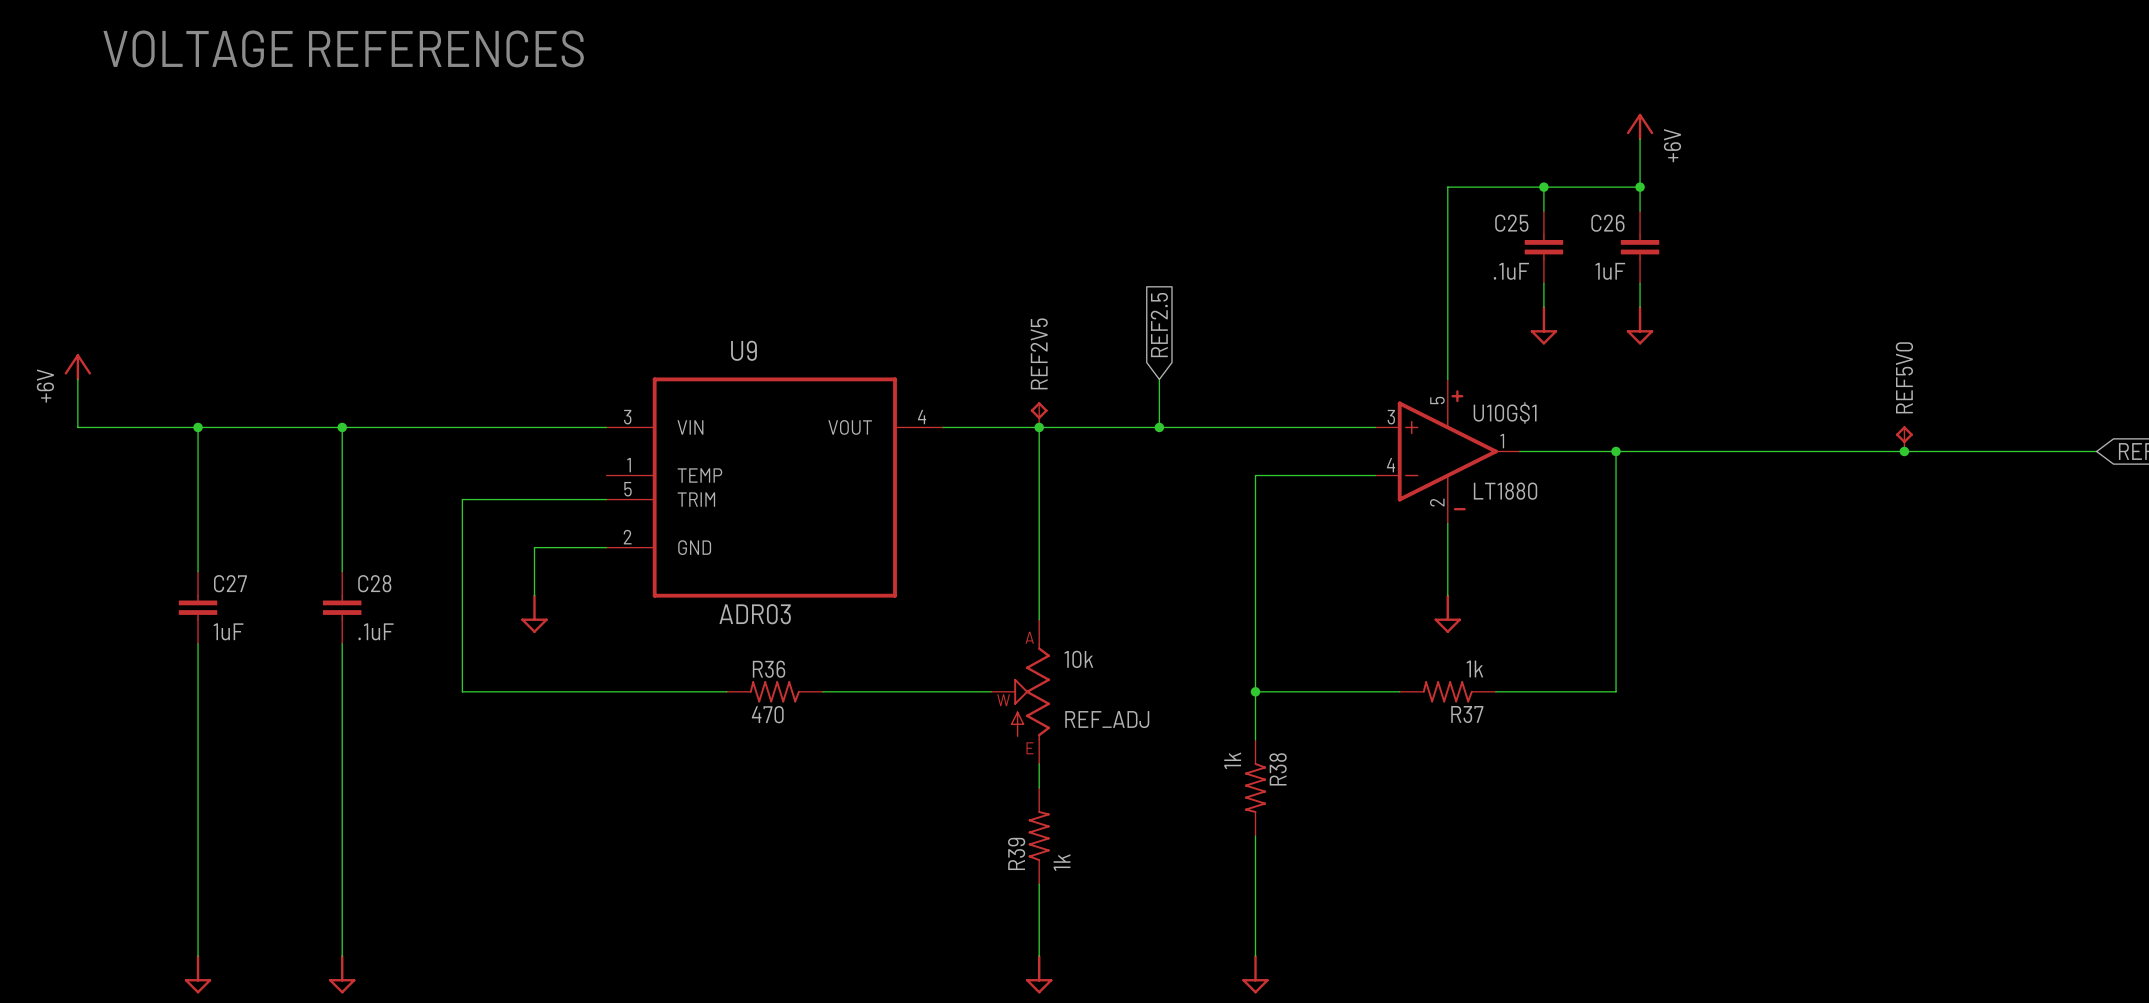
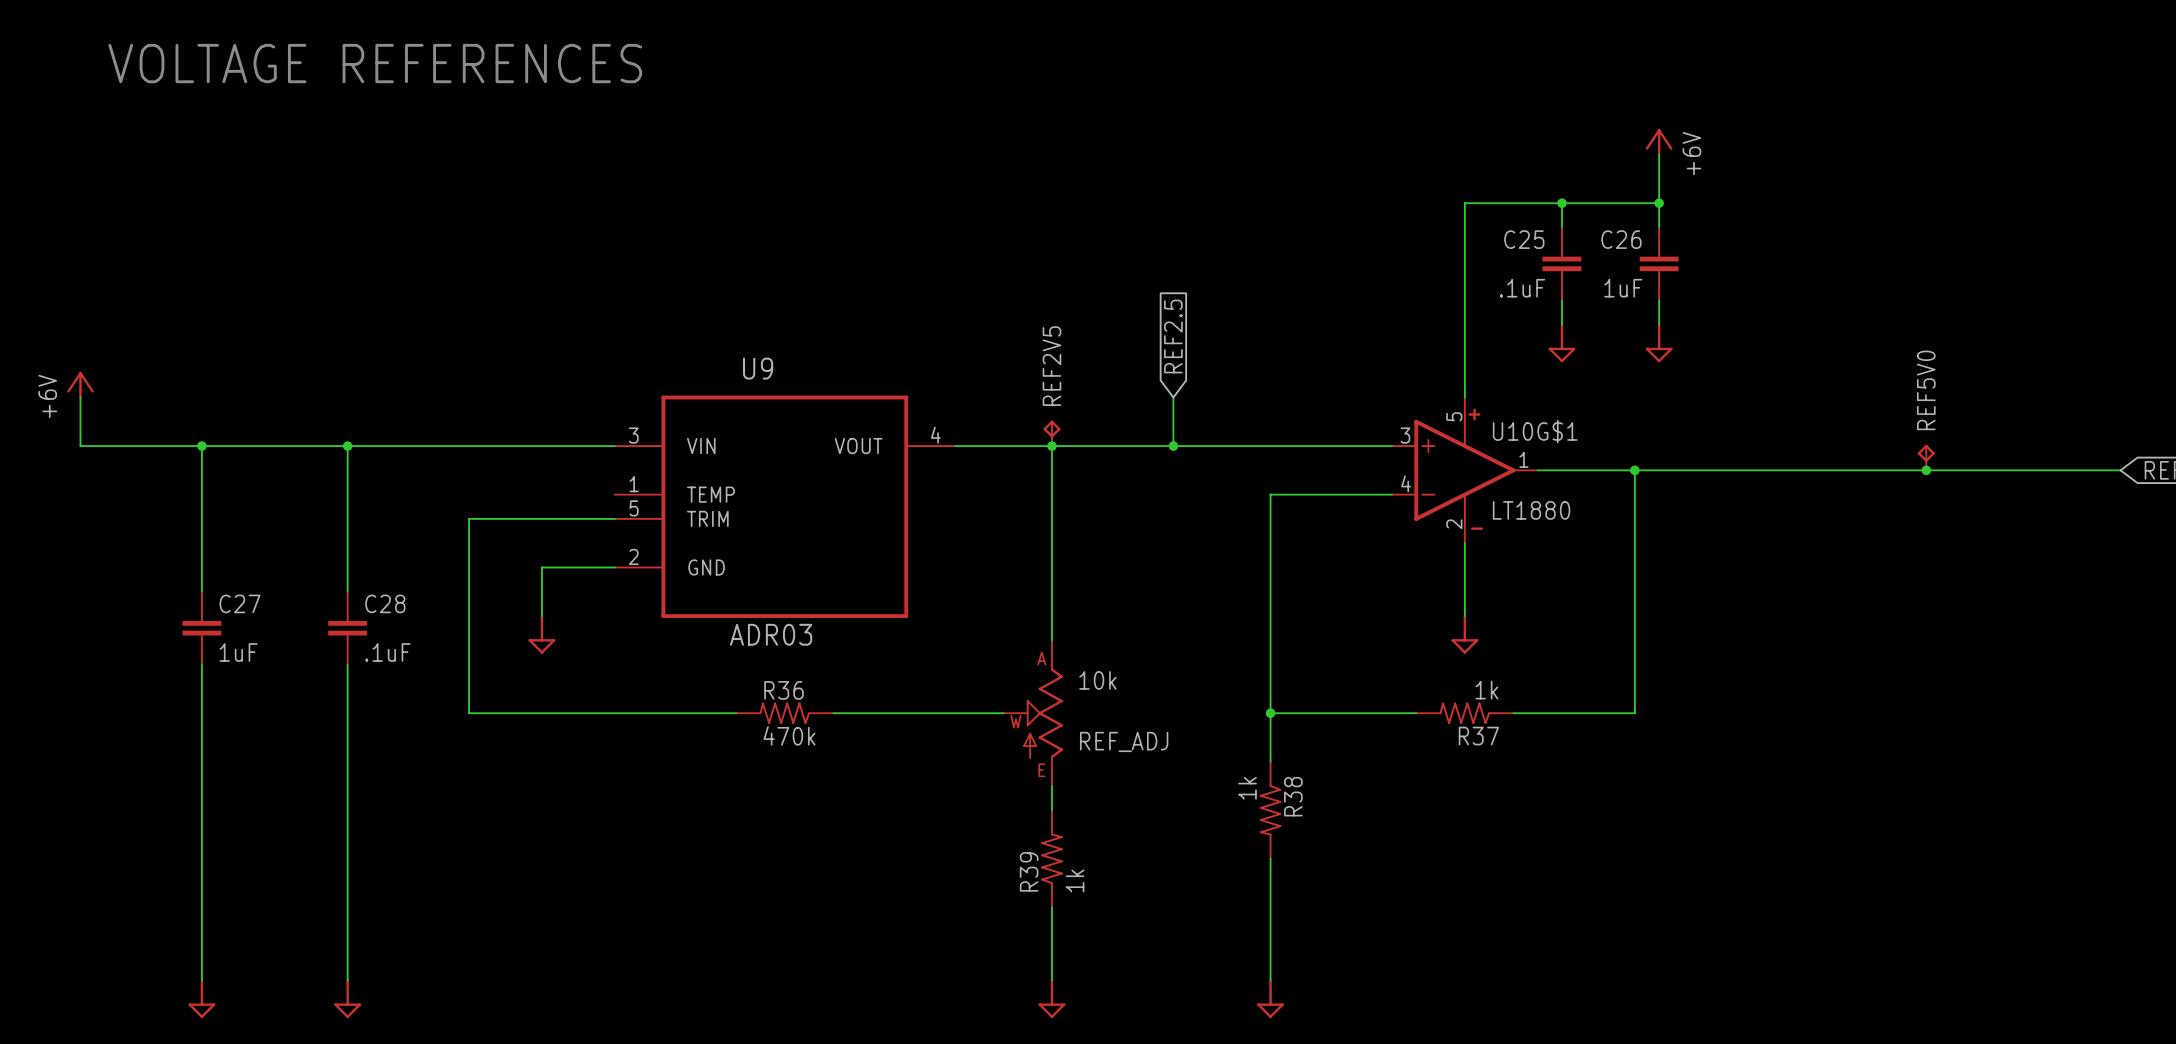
R36 value: 470 (767, 714) -> 470k (789, 735)

